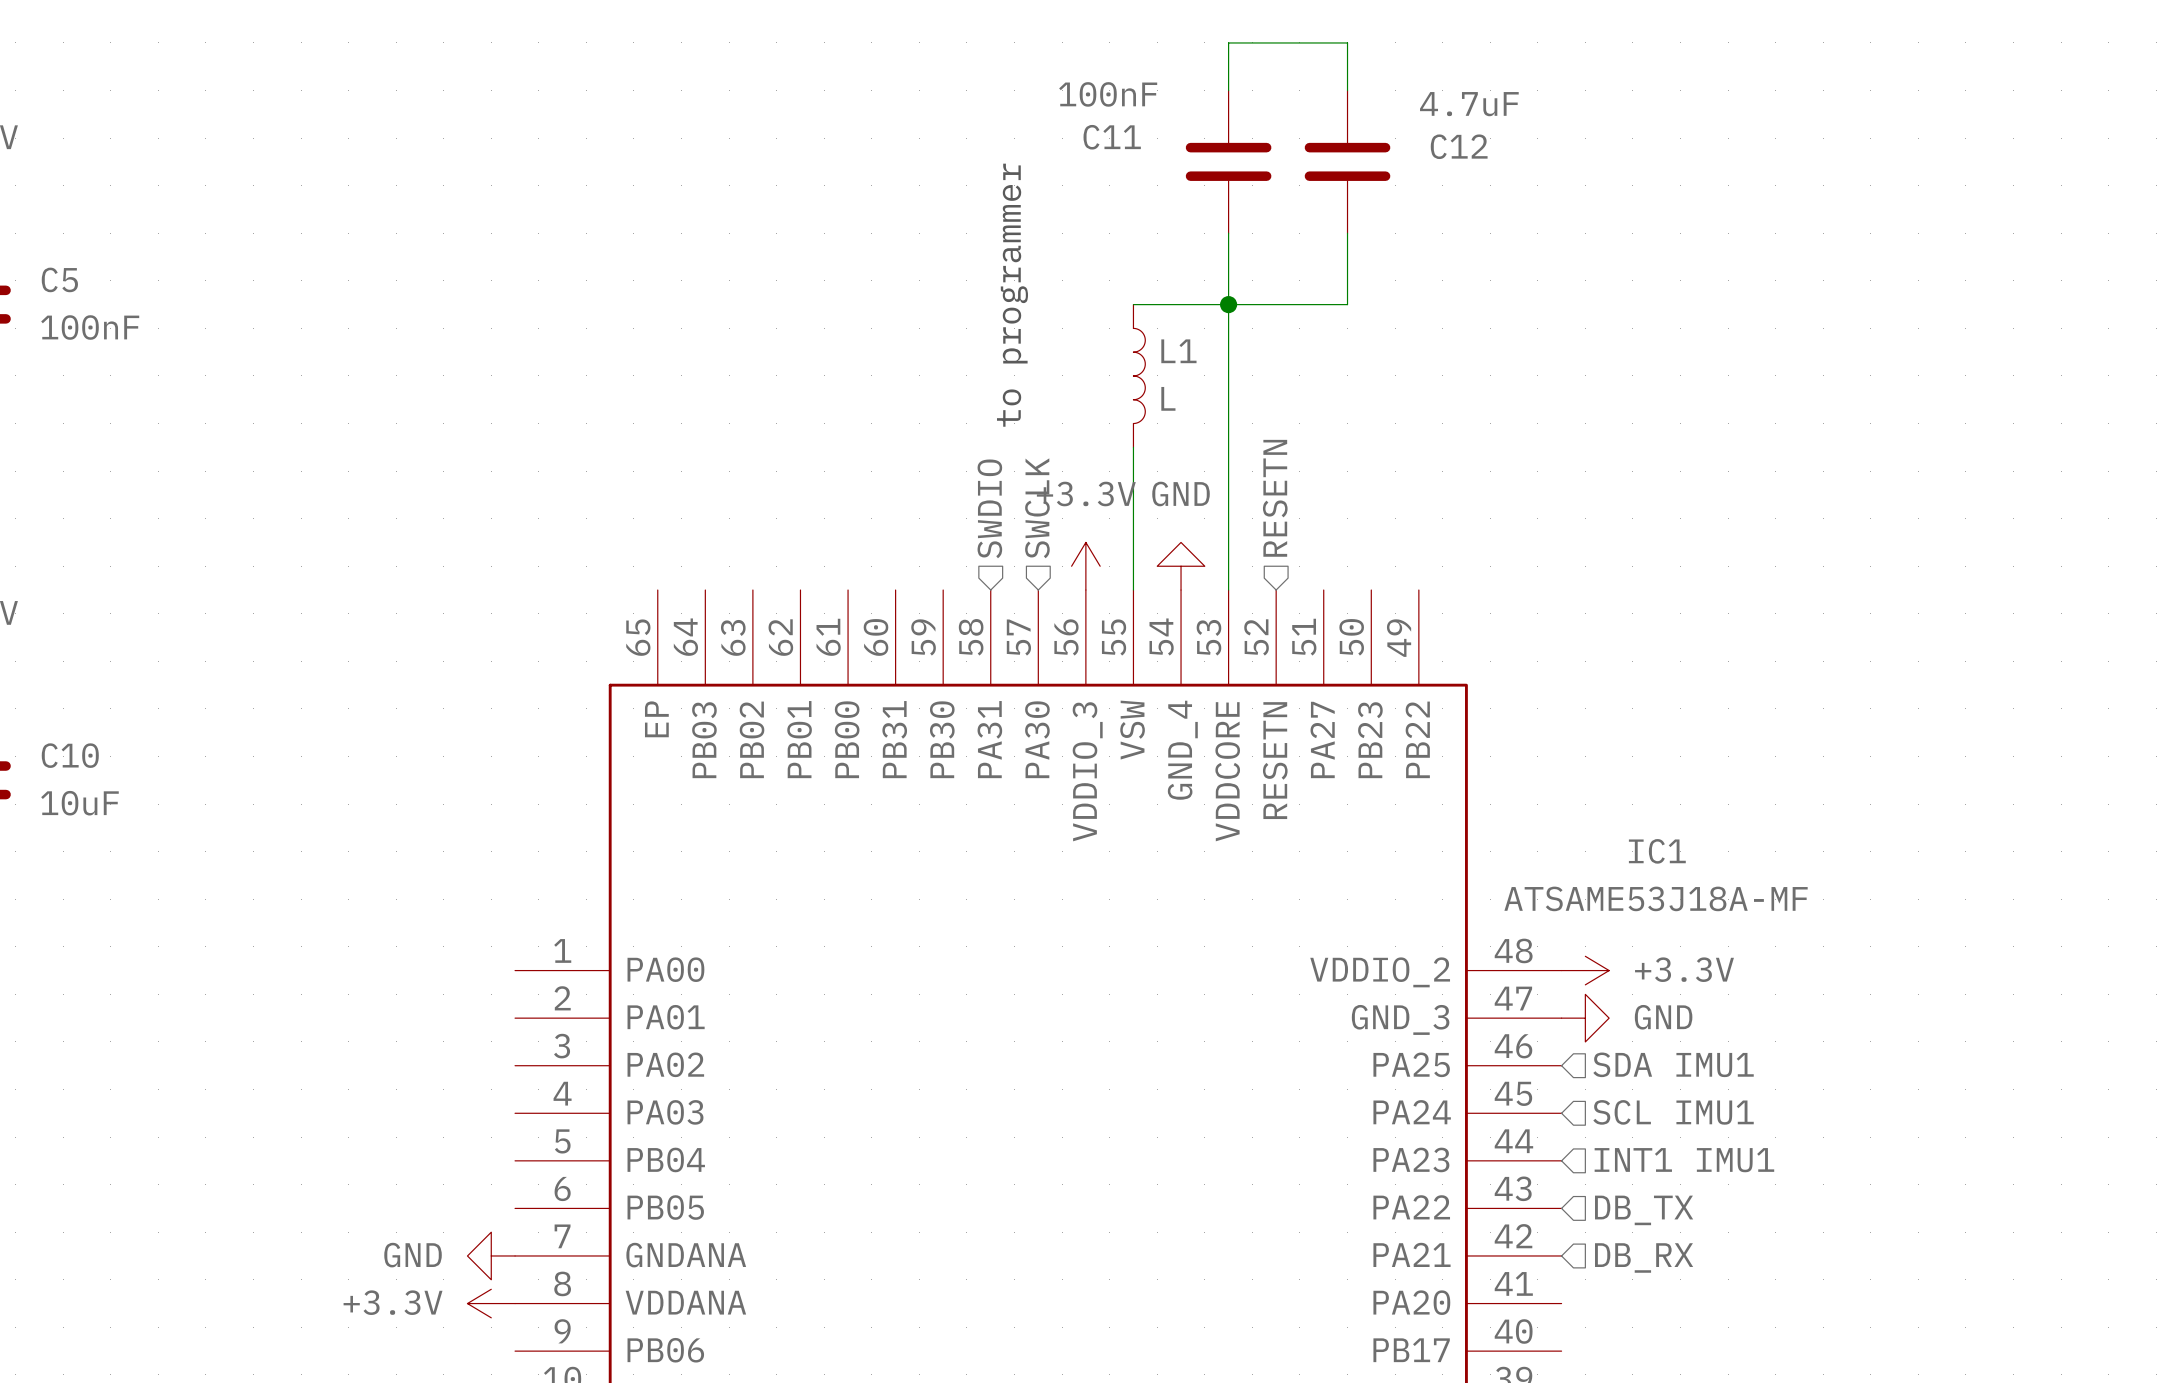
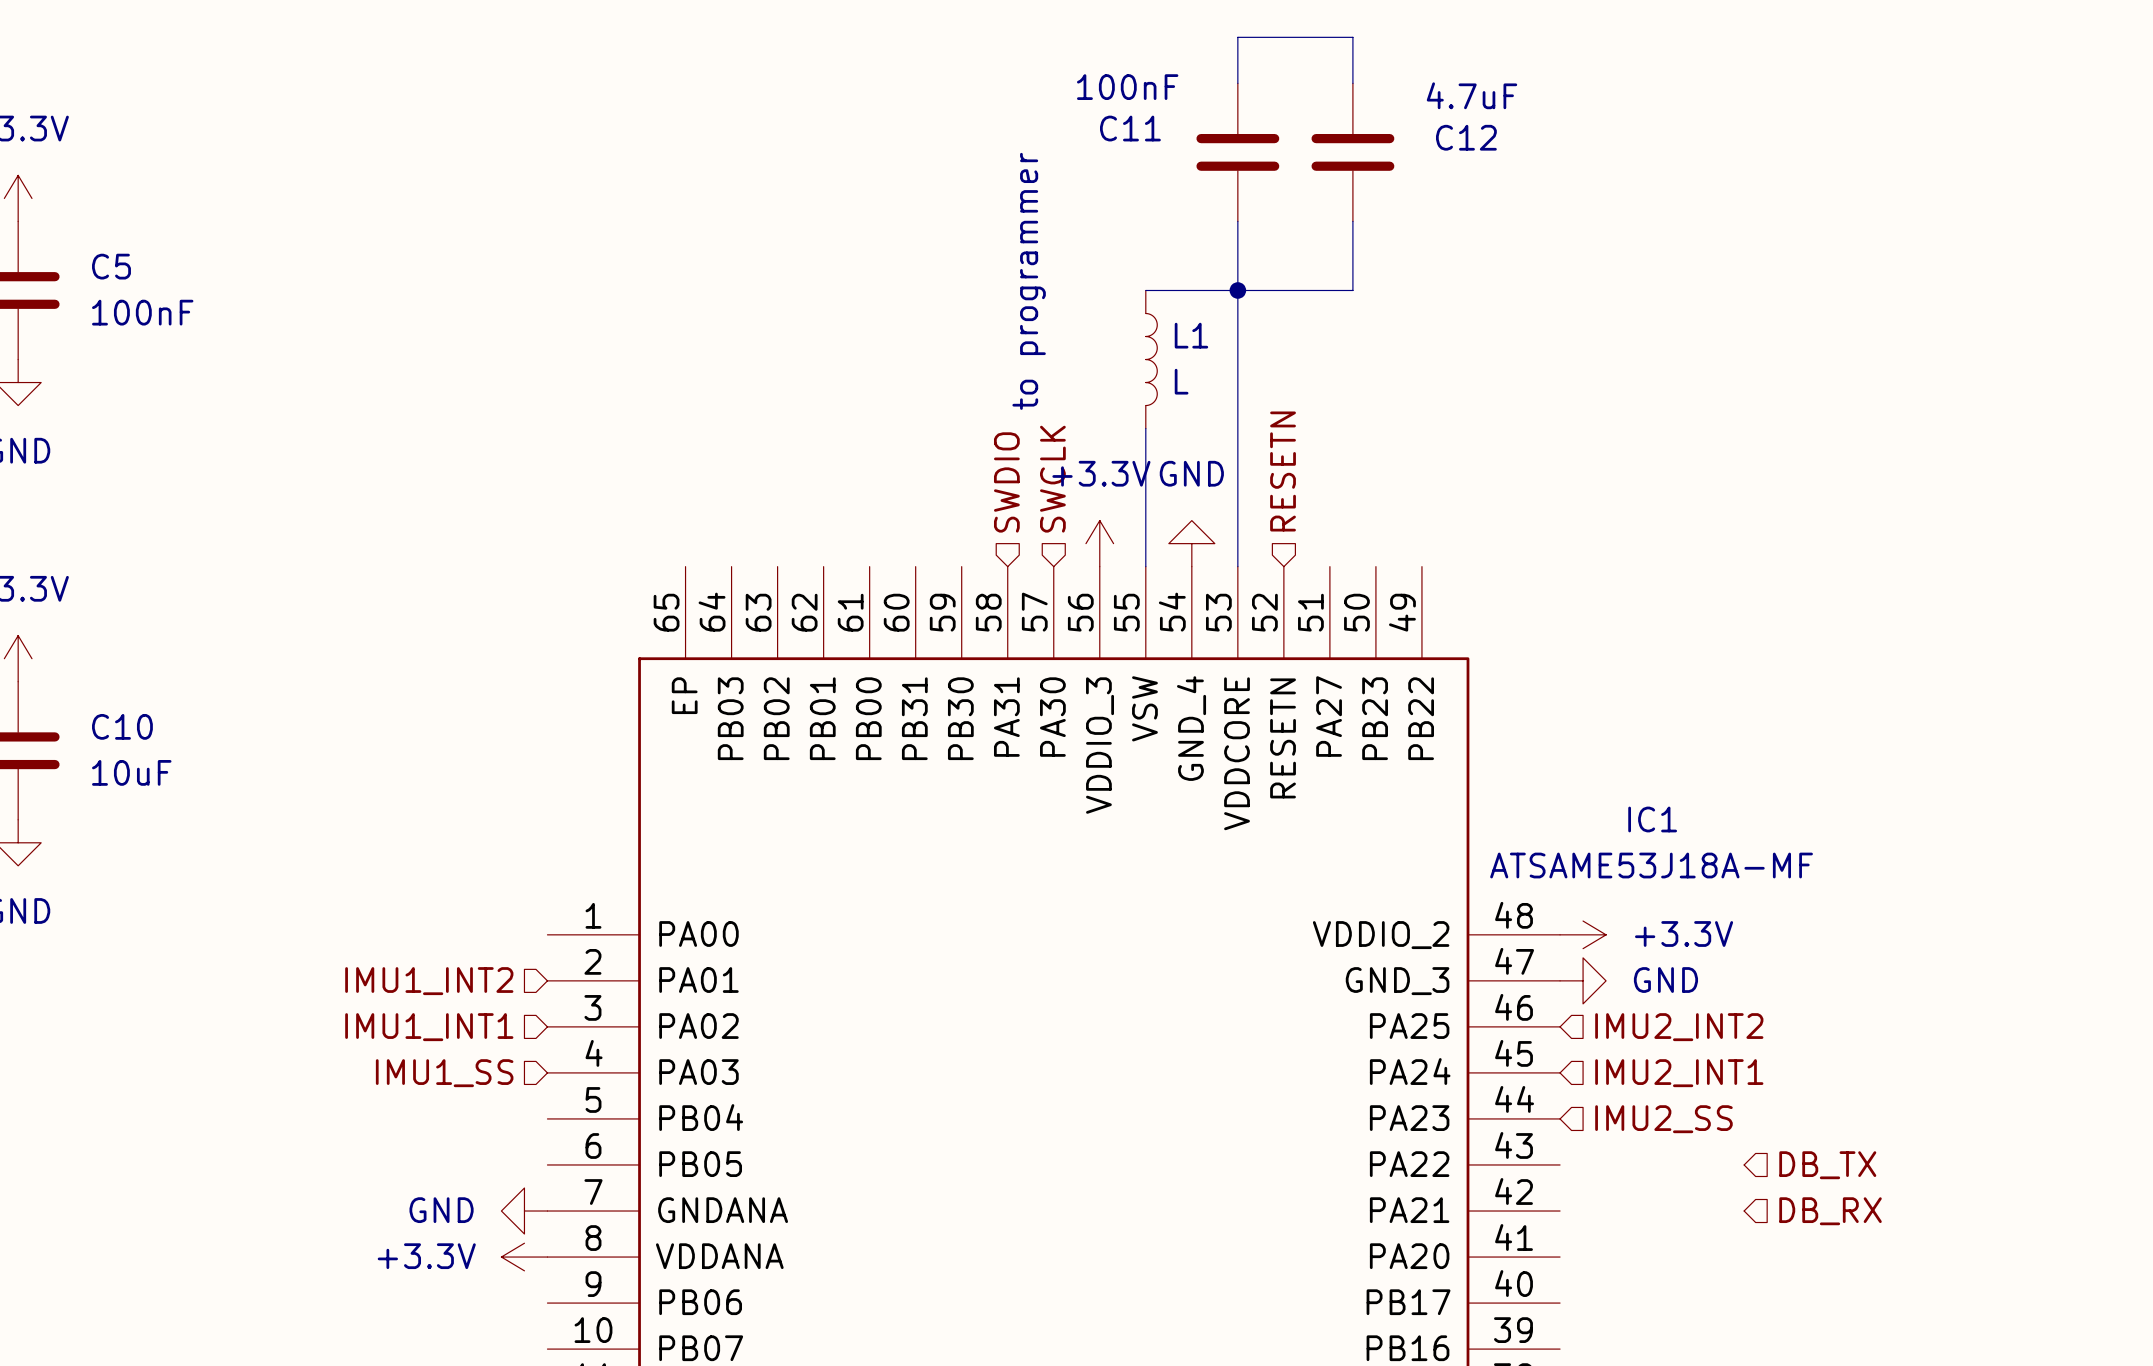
hierarchical label: none -> IMU1_INT2 (429, 981)
hierarchical label: SDA IMU1 (1673, 1064) -> IMU2_INT2 (1679, 1027)
hierarchical label: none -> IMU1_INT1 (429, 1027)
hierarchical label: SCL IMU1 (1673, 1112) -> IMU2_INT1 (1679, 1073)
hierarchical label: none -> IMU1_SS (444, 1073)
hierarchical label: INT1 IMU1 (1684, 1160) -> IMU2_SS (1663, 1119)
hierarchical label position: DB_TX (1644, 1210) -> DB_TX (1827, 1165)
hierarchical label position: DB_RX (1644, 1257) -> DB_RX (1830, 1211)

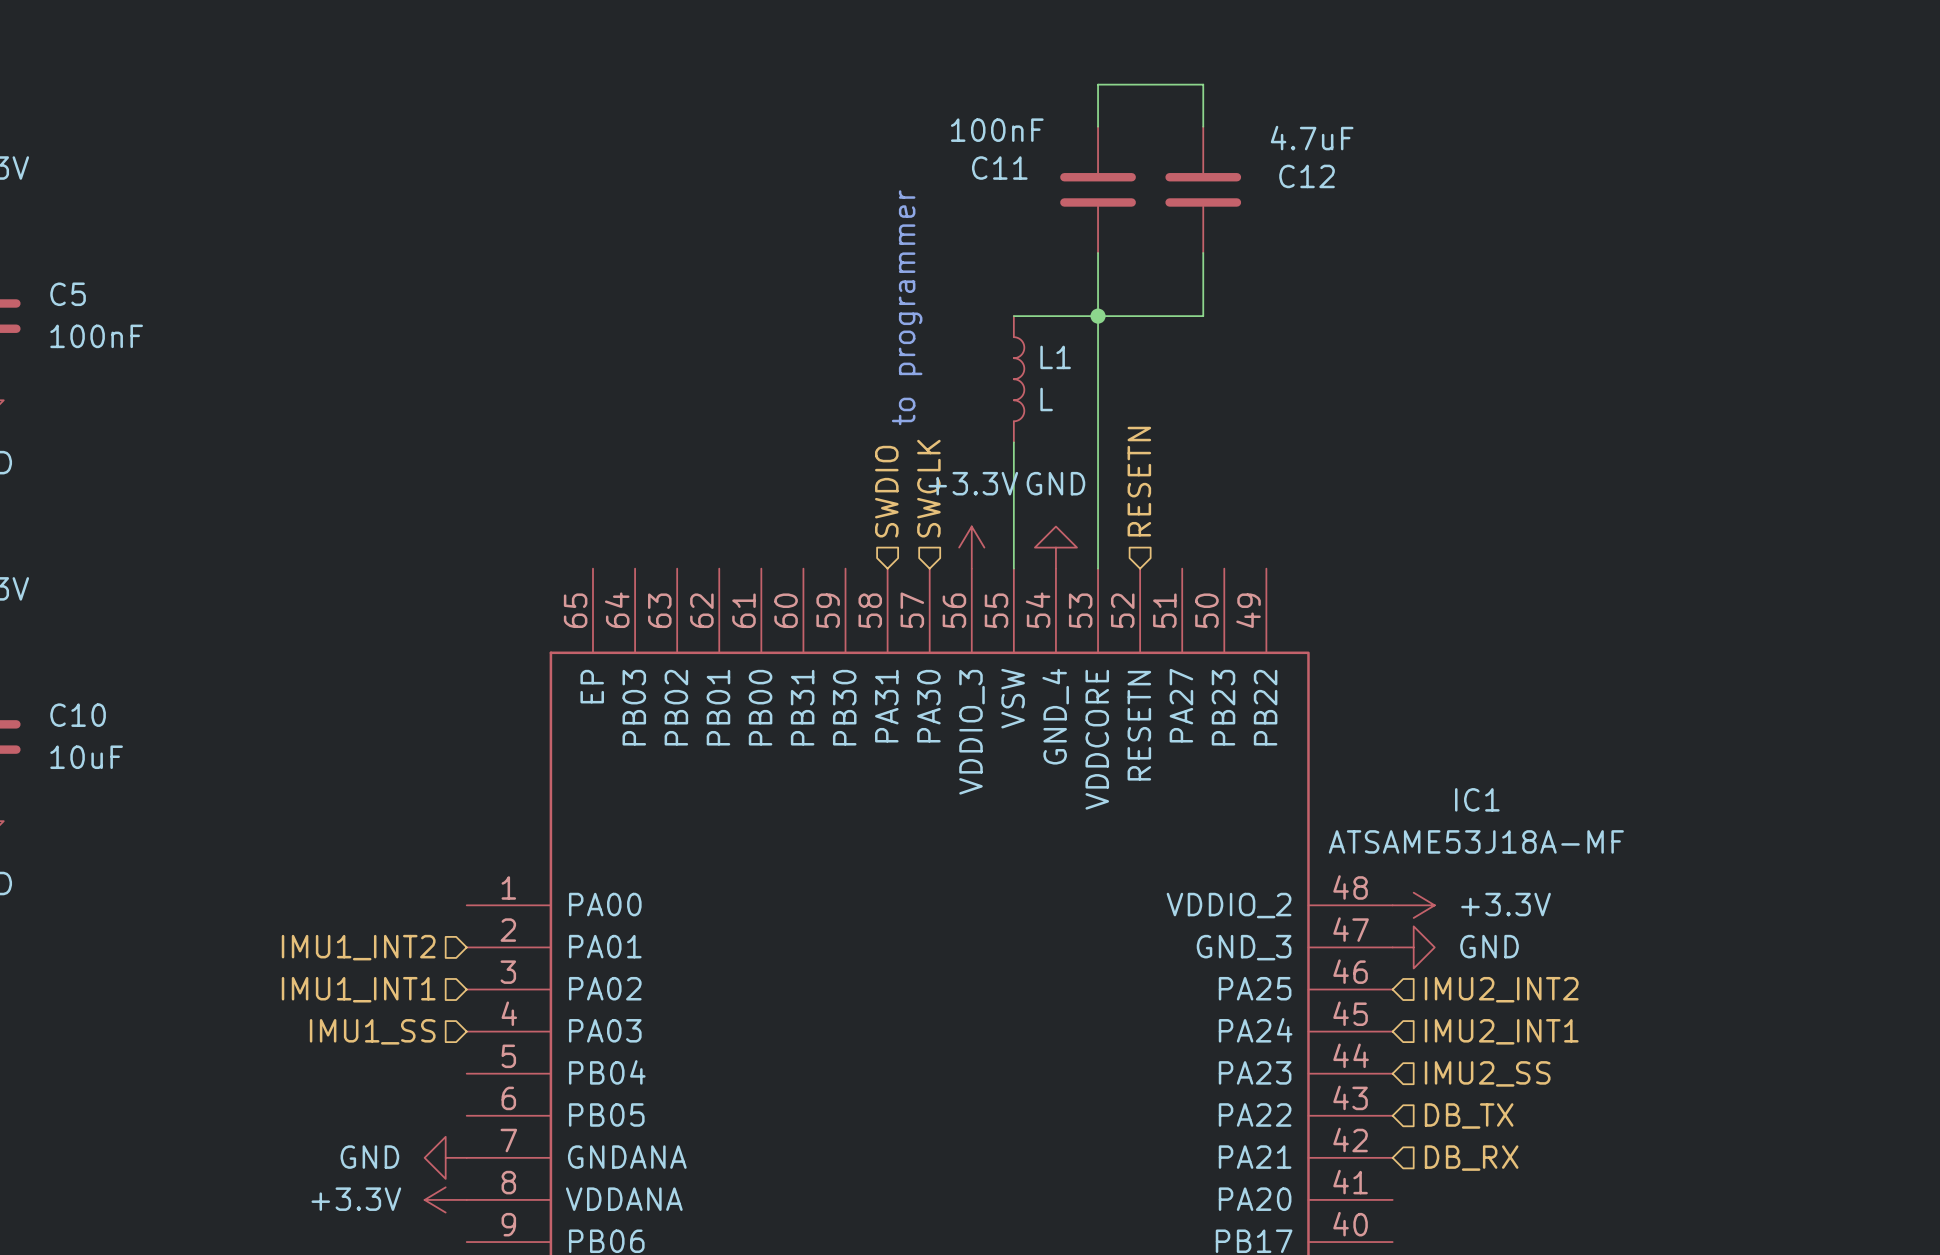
hierarchical label position: DB_TX (1827, 1165) -> DB_TX (1469, 1115)
hierarchical label position: DB_RX (1830, 1211) -> DB_RX (1471, 1158)

